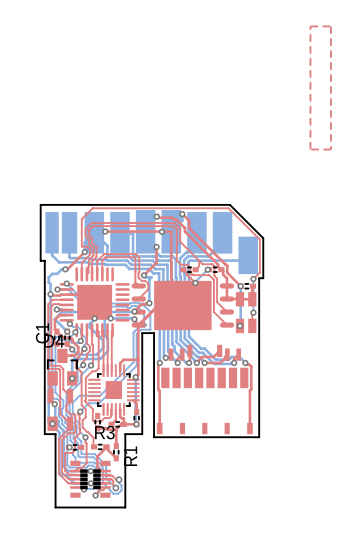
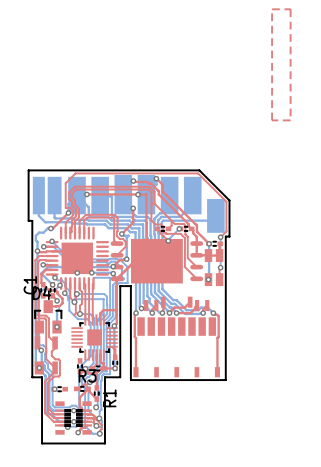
bottom track: (104, 312) (103, 334) (107, 338) (107, 351) (100, 359) (74, 358) -> none
bottom track: (94, 318) (89, 323) (89, 327) (103, 340) (103, 348) (96, 354) (76, 354) (72, 349) -> none
bottom track: none -> (93, 277) (110, 277) (110, 315) (103, 321) (103, 366) (96, 373) (96, 378) (91, 383) (89, 382)
top track: (97, 330) (98, 368) (85, 377) (84, 400) (93, 409) (94, 421) (101, 421) (104, 418) (109, 418) (111, 409) -> (79, 283) (79, 289) (81, 291) (79, 314)
bottom track: (134, 332) (133, 362) (100, 395) (79, 395) (72, 402) (74, 419) (79, 424) (79, 431) (85, 437) -> (112, 285) (112, 316) (106, 322) (106, 371) (102, 371) (99, 374) (96, 407)
bottom track: (137, 333) (136, 365) (99, 403) (88, 403) (80, 411) -> (115, 286) (115, 317) (109, 323) (110, 374) (101, 376) (101, 409)
bottom track: (80, 340) (78, 343) (72, 343) (69, 340) (59, 339) (55, 344) (55, 392) (63, 400) (62, 415) (70, 427) (70, 440) (75, 445) (72, 454) (75, 457) (75, 462) (94, 462) (96, 464) -> (64, 293) (69, 297) (69, 310) (77, 319) (87, 319) (90, 322) (90, 356) (80, 366) (79, 404)
bottom track: none -> (76, 294) (104, 294) (106, 296) (107, 314) (100, 320) (100, 365) (84, 379) (84, 384) (88, 387) (88, 410) (97, 419) (101, 421) (101, 427) (96, 427)
via: none -> (76, 294)
top track: (86, 343) (89, 346) (89, 351) (81, 362) (83, 365) -> (70, 295) (74, 302)
bottom track: none -> (103, 299) (103, 313) (97, 321) (97, 364) (81, 378) (81, 385) (85, 388) (85, 426) (92, 433) (99, 433)
bottom track: none -> (103, 299) (74, 299) (74, 302)
top track: (84, 348) (78, 357) (75, 367) (81, 372) (81, 405) (85, 409) (82, 427) (93, 437) (94, 446) -> (89, 382) (76, 388)
via: (84, 348) -> none
via: none -> (74, 302)
bottom track: none -> (79, 314) (90, 314) (94, 318) (93, 363) (85, 368)
via: none -> (79, 314)
bottom track: (83, 365) (77, 369) (77, 380) (66, 391) (66, 415) (68, 421) (73, 426) (73, 438) (78, 443) (78, 455) (93, 457) (102, 466) (103, 482) (113, 493) (118, 493) (121, 490) (119, 479) -> none
via: (83, 365) -> none
bottom track: (91, 365) (80, 375) (80, 382) (69, 393) (69, 413) (71, 420) (76, 425) (76, 437) (81, 441) (81, 453) -> none
via: (91, 365) -> none
top track: (80, 411) (78, 413) (80, 432) (75, 437) (75, 450) (72, 452) (65, 453) (65, 470) (68, 474) (75, 475) -> (47, 408) (54, 414) (59, 414)
via: (80, 411) -> none
via: none -> (85, 368)
top track: (85, 437) (86, 463) (75, 471) -> none
via: (85, 437) -> none
via: none -> (89, 382)
bottom track: (81, 454) (94, 454) (106, 465) (106, 478) (115, 487) -> none
via: none -> (96, 407)
bottom track: none -> (101, 409) (99, 414)
top track: none -> (87, 418) (95, 418) (101, 424) (99, 433)
via: none -> (99, 433)

